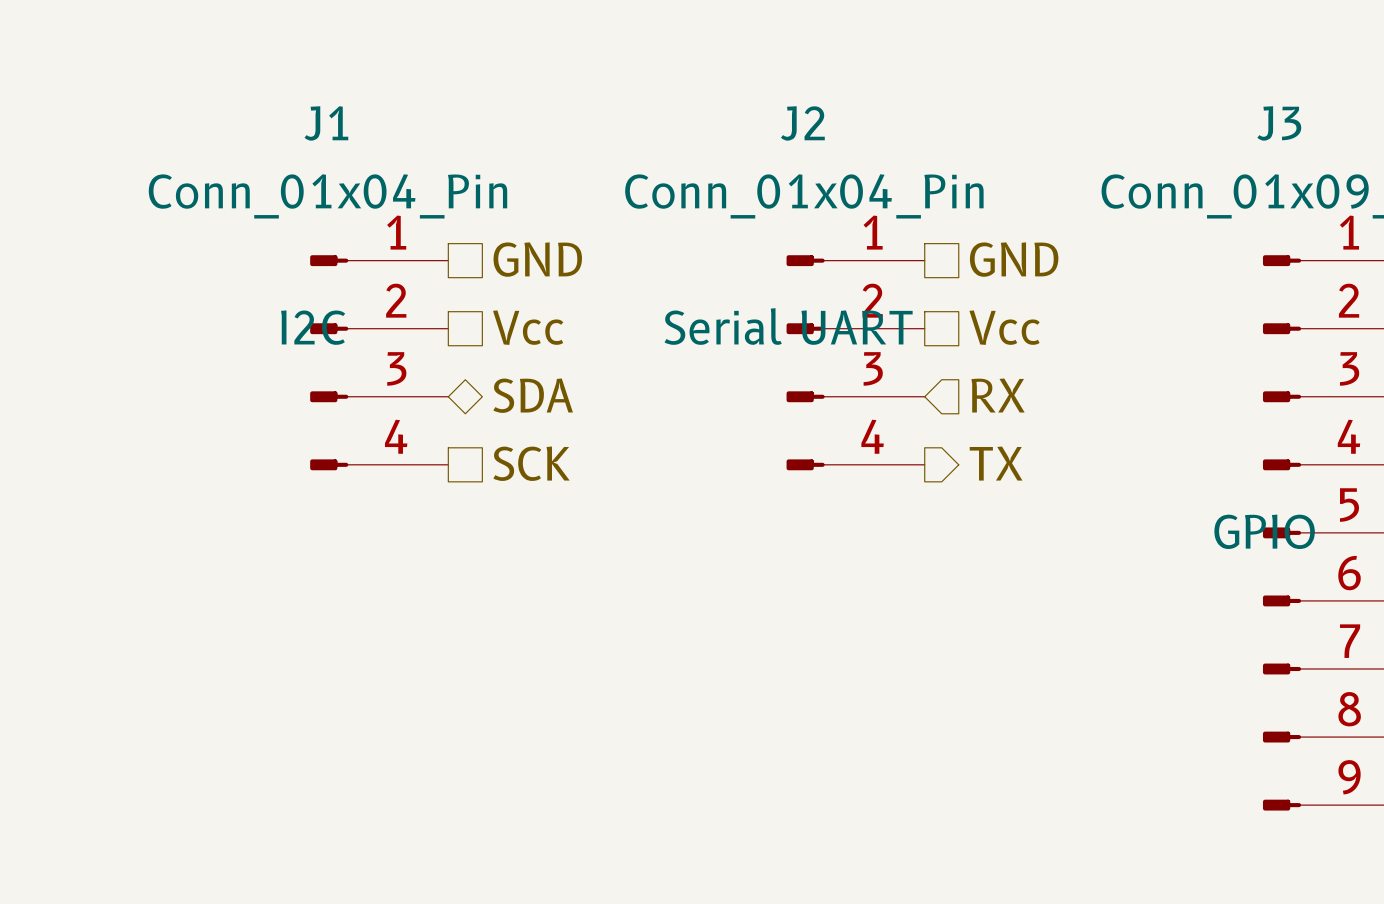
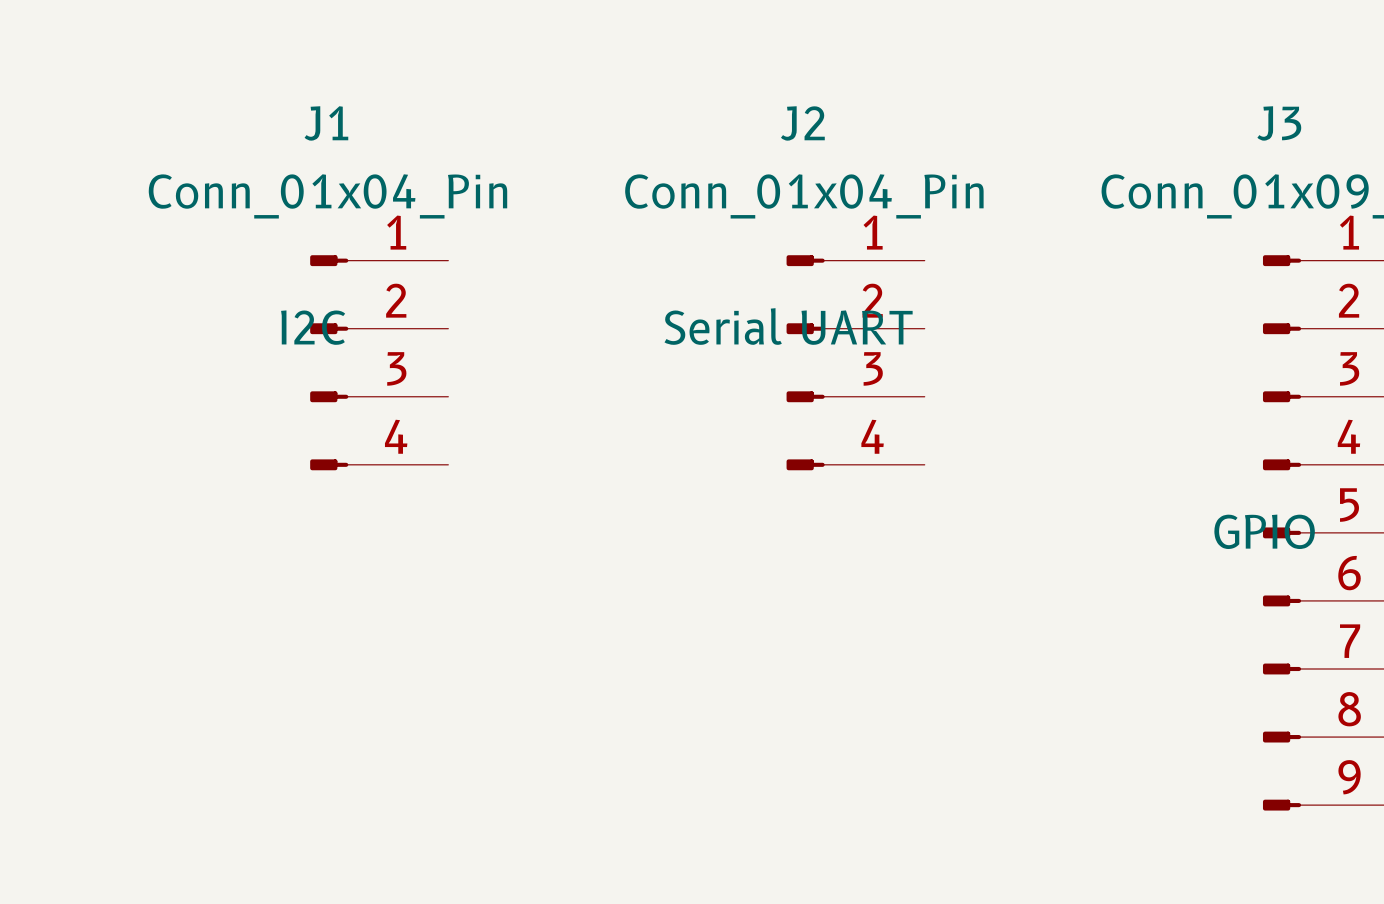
hierarchical label: GND (537, 259) -> none
hierarchical label: GND (1014, 259) -> none
hierarchical label: Vcc (528, 327) -> none
hierarchical label: Vcc (1004, 327) -> none
hierarchical label: SDA (533, 395) -> none
hierarchical label: RX (998, 395) -> none
hierarchical label: SCK (531, 463) -> none
hierarchical label: TX (996, 463) -> none

